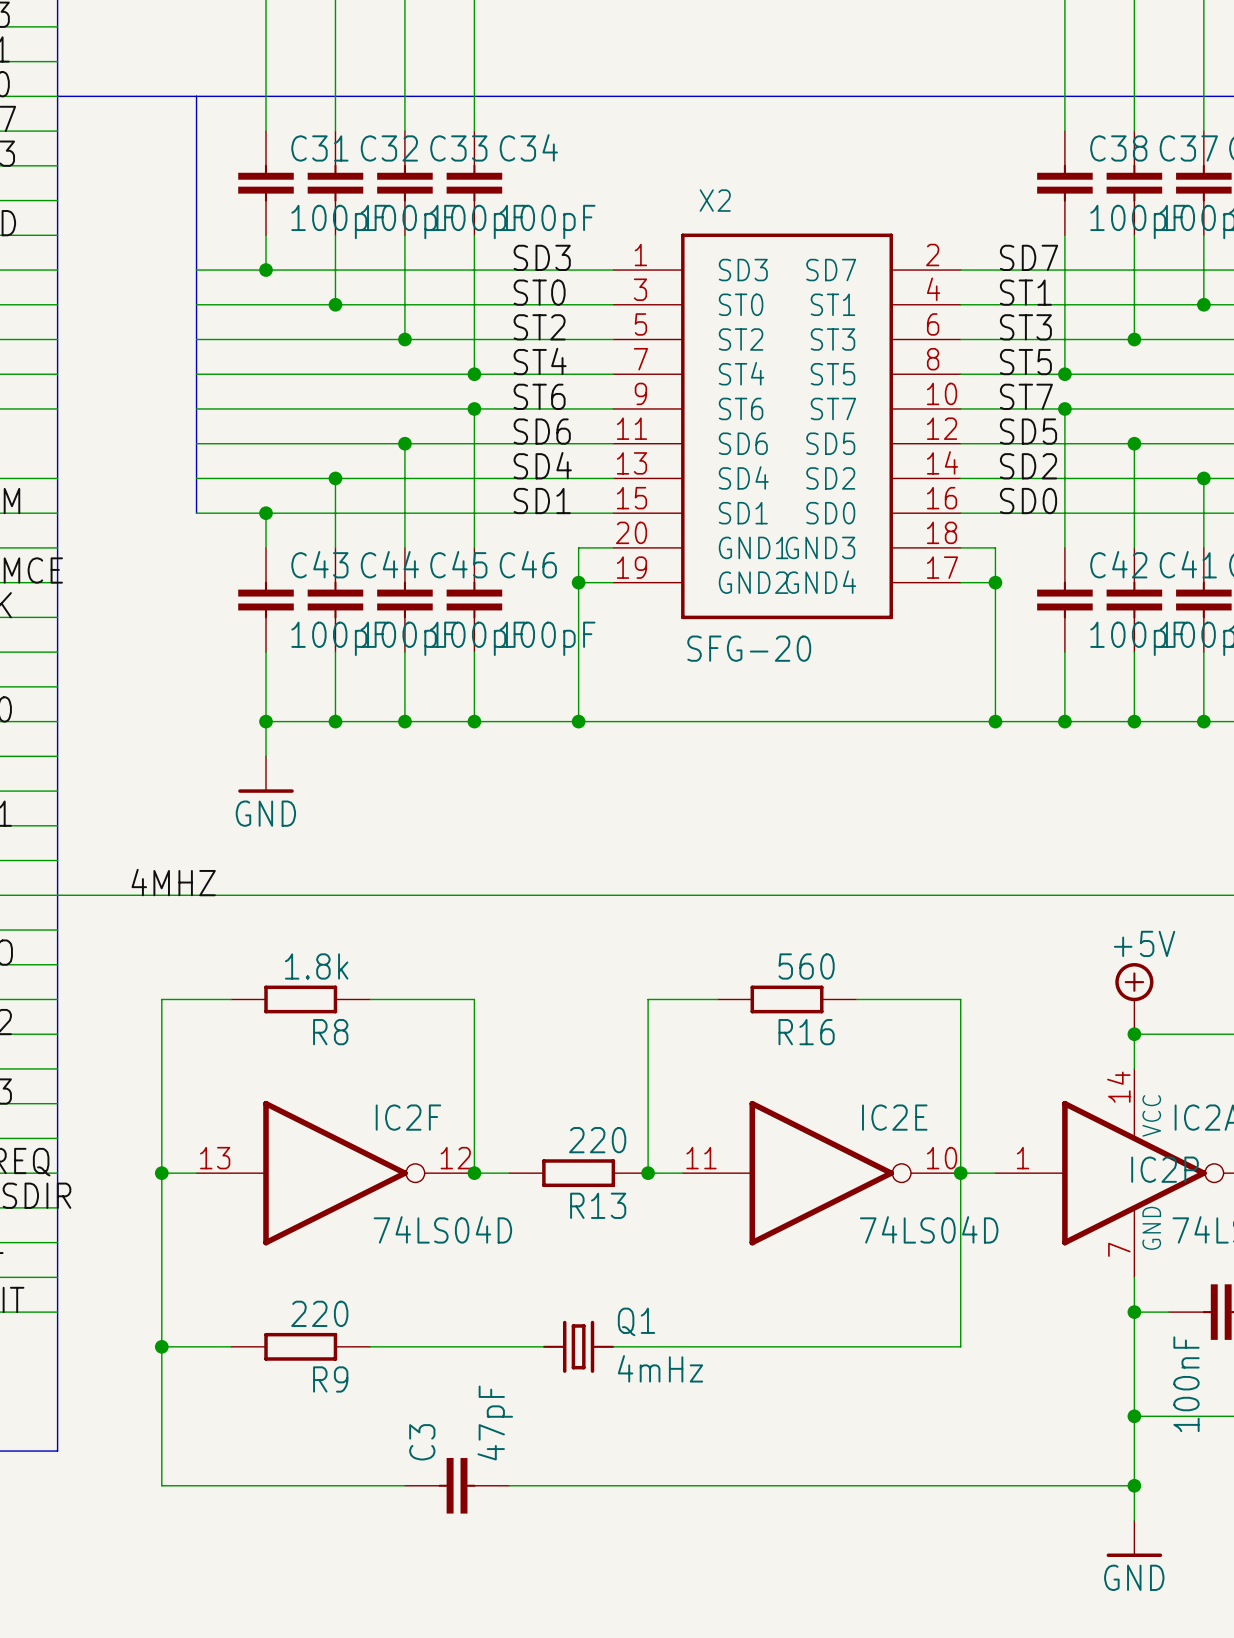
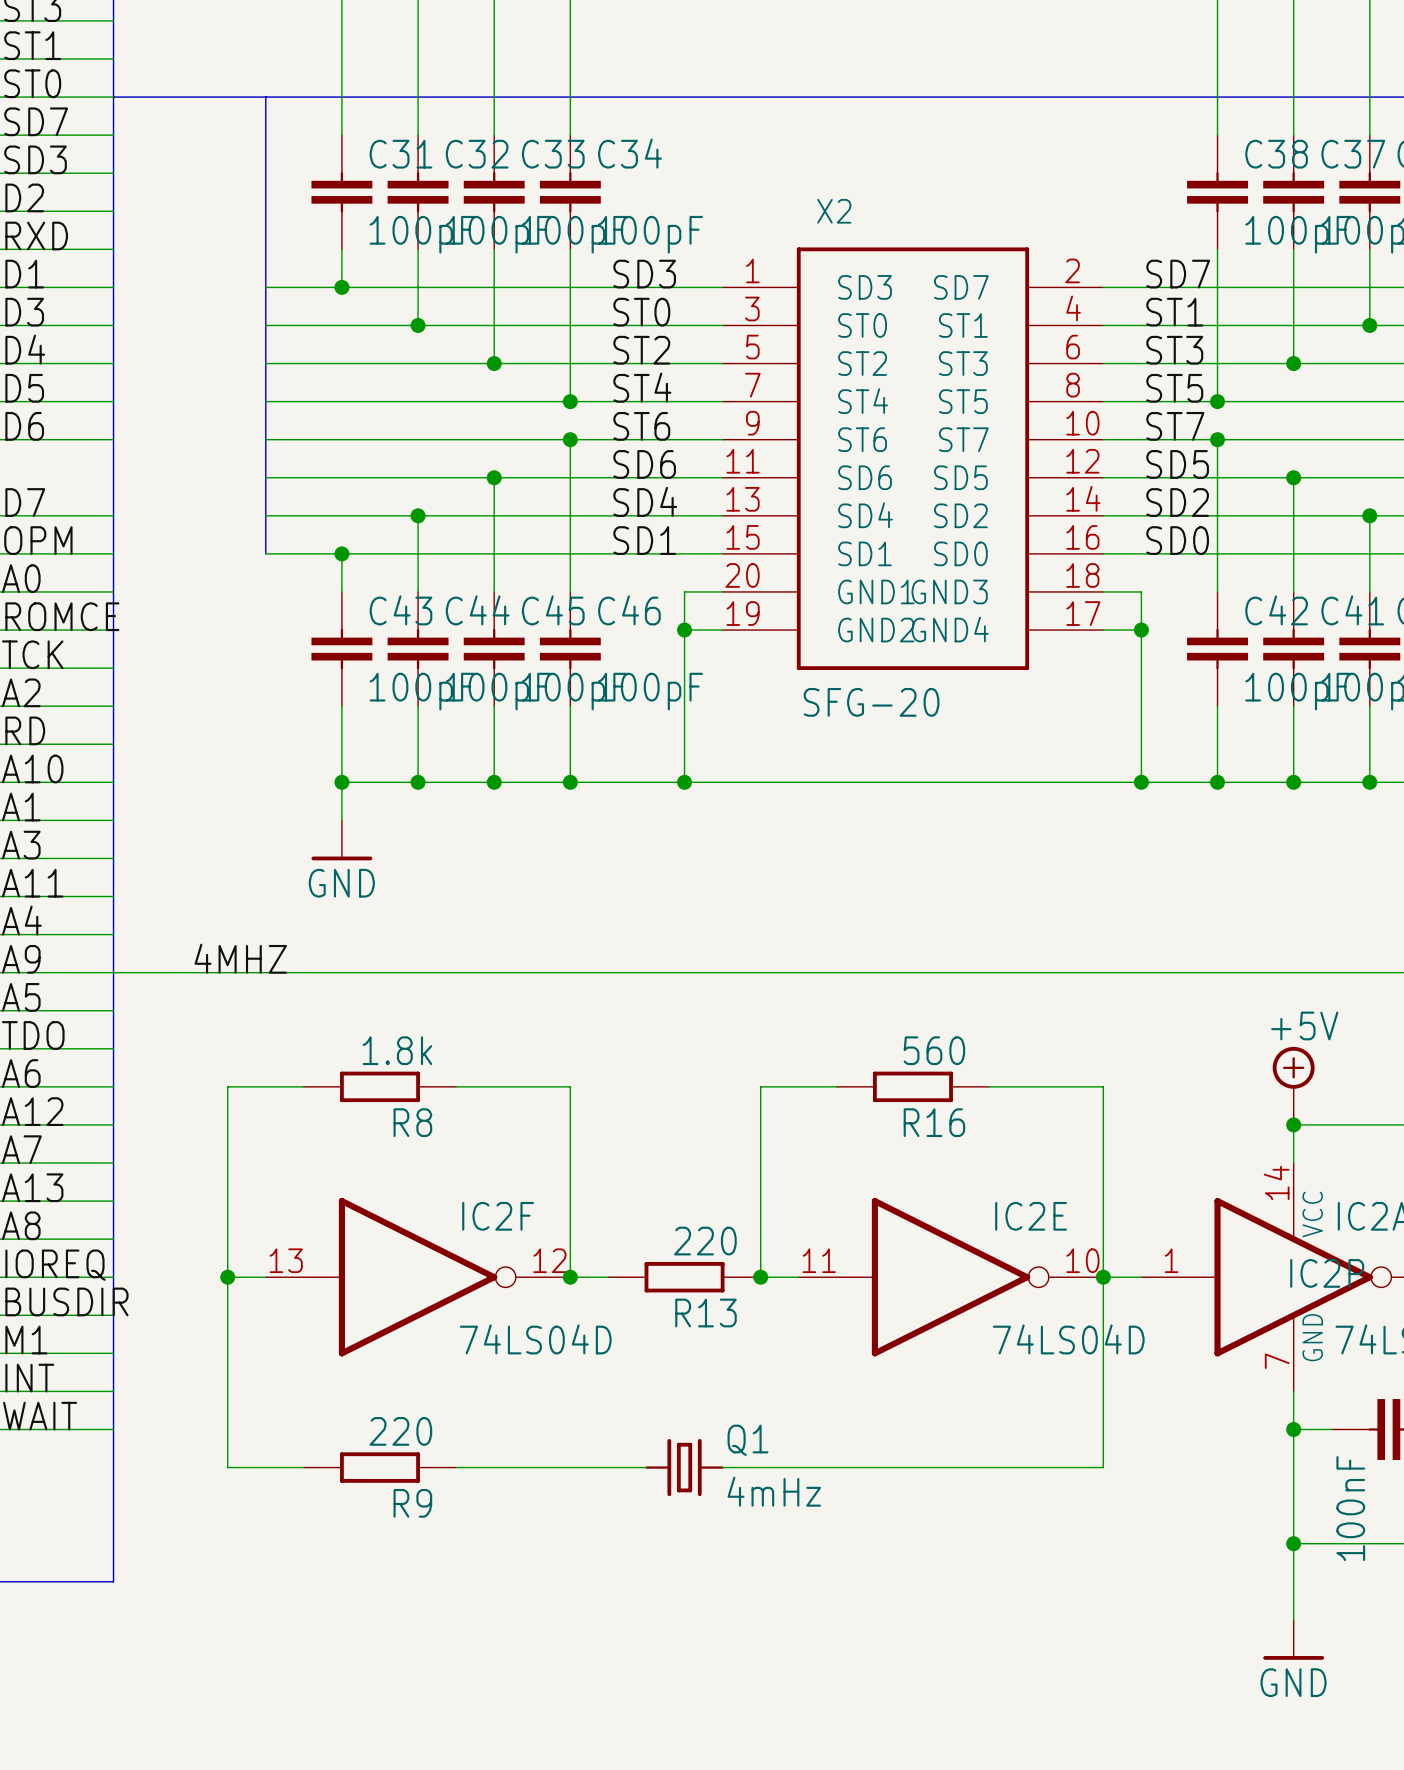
wire: (161, 1346) (161, 1485) (404, 1485) -> none
junction: (161, 1346) -> none
C3: 47pF (457, 1485) -> none
wire: (509, 1485) (1134, 1485) (1134, 1520) -> none
junction: (1134, 1485) -> none
power symbol position: GND (1134, 1538) -> GND (1293, 1639)

